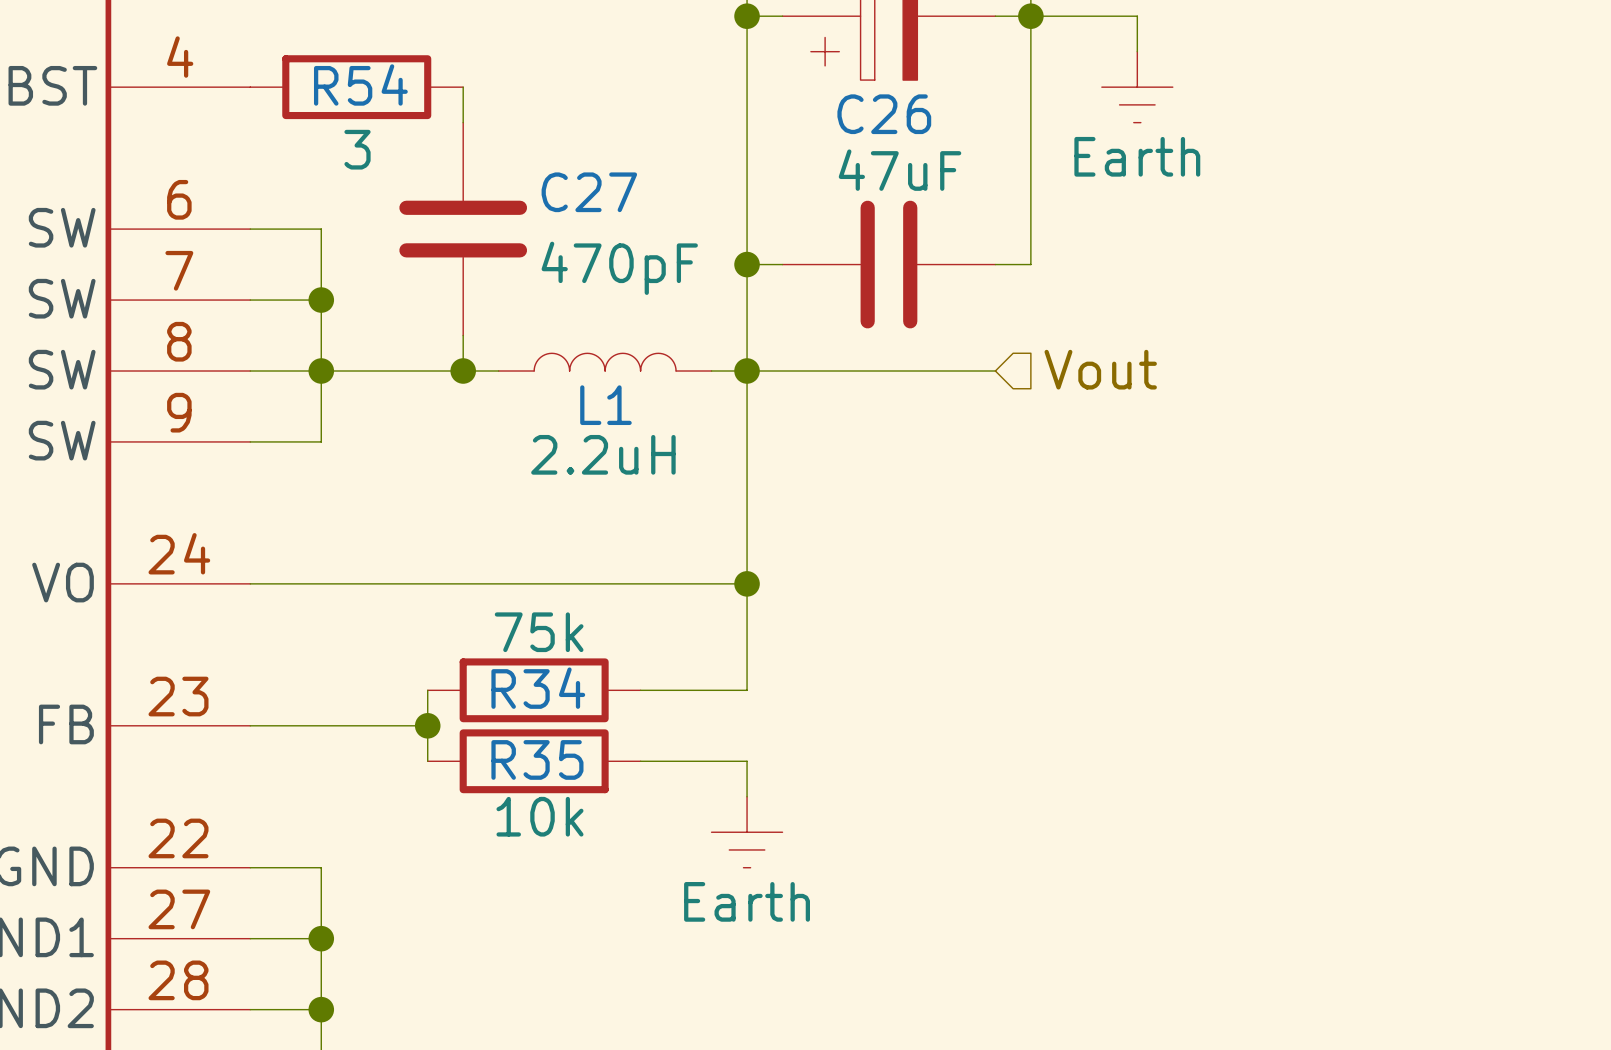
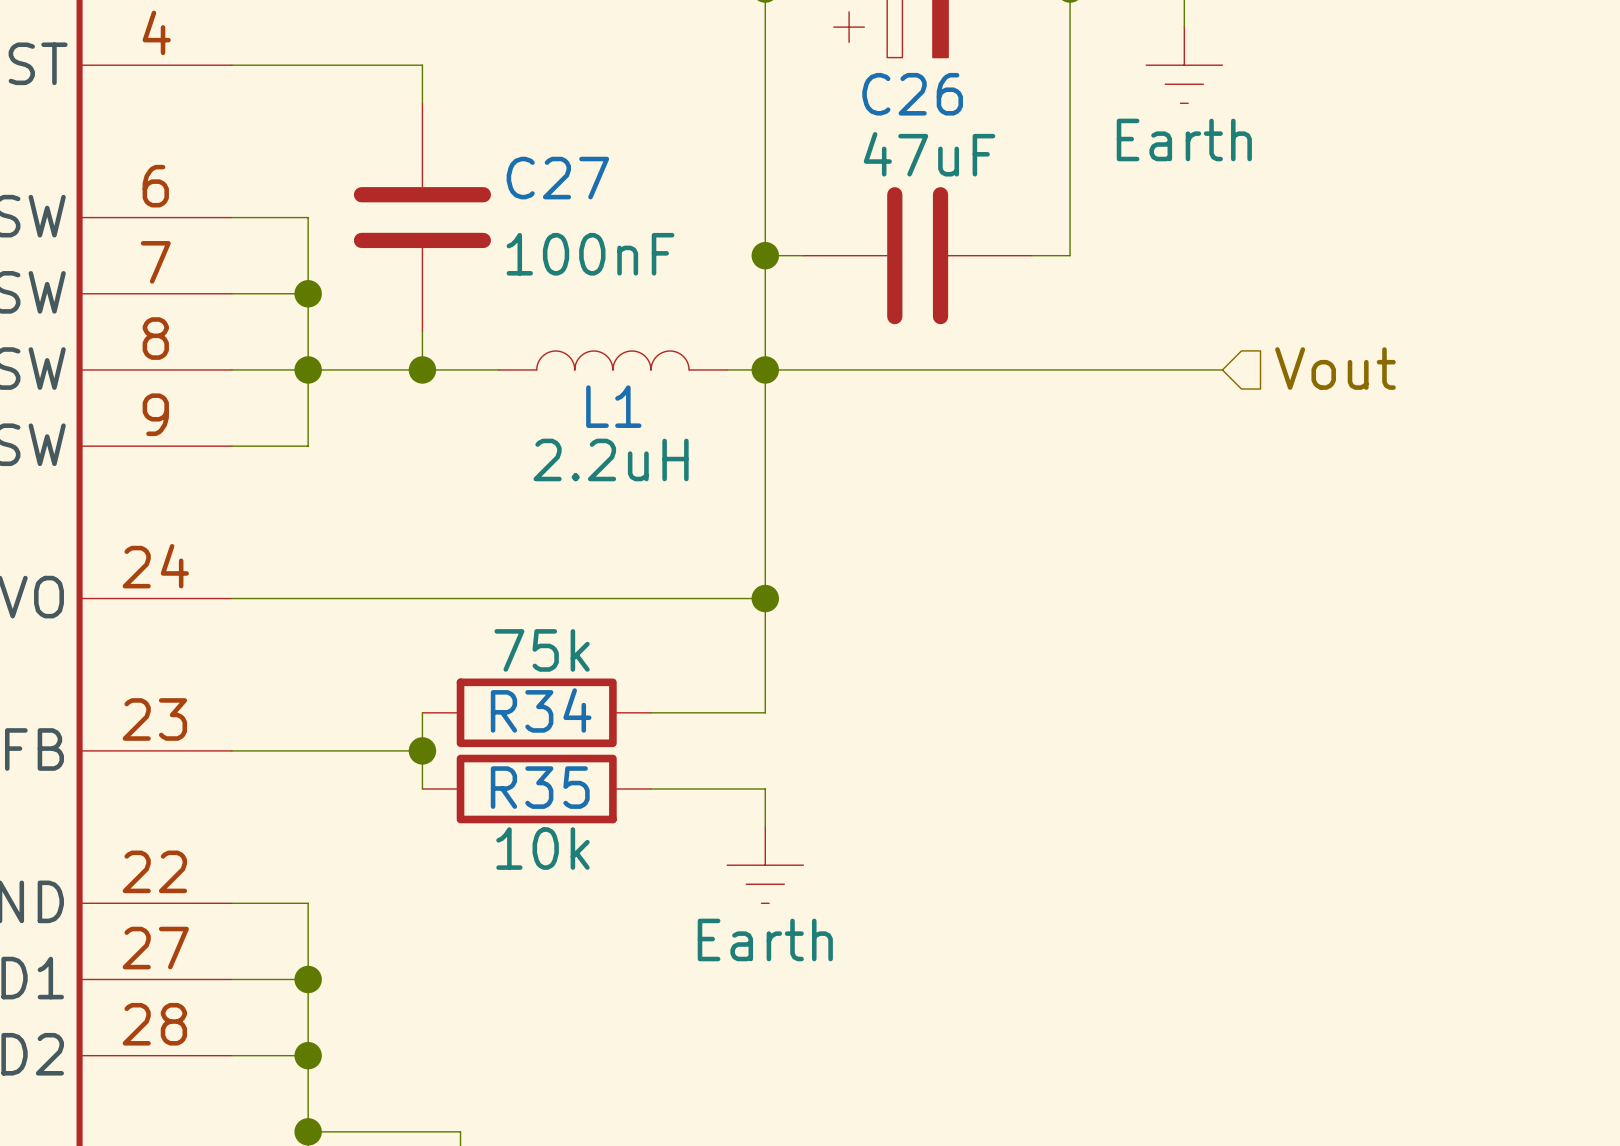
wire: none -> (231, 65) (422, 65) (422, 103)
R54: 3 (356, 87) -> none
wire: (463, 87) (463, 122) -> none
C27 position: (463, 229) -> (422, 217)
C27 value: 470pF (619, 268) -> 100nF (590, 254)
wire: (463, 335) (463, 371) -> (422, 331) (422, 369)
hierarchical label position: Vout (1100, 369) -> Vout (1335, 368)
junction position: (463, 371) -> (422, 369)
wire: none -> (1031, 369) (1222, 369)

